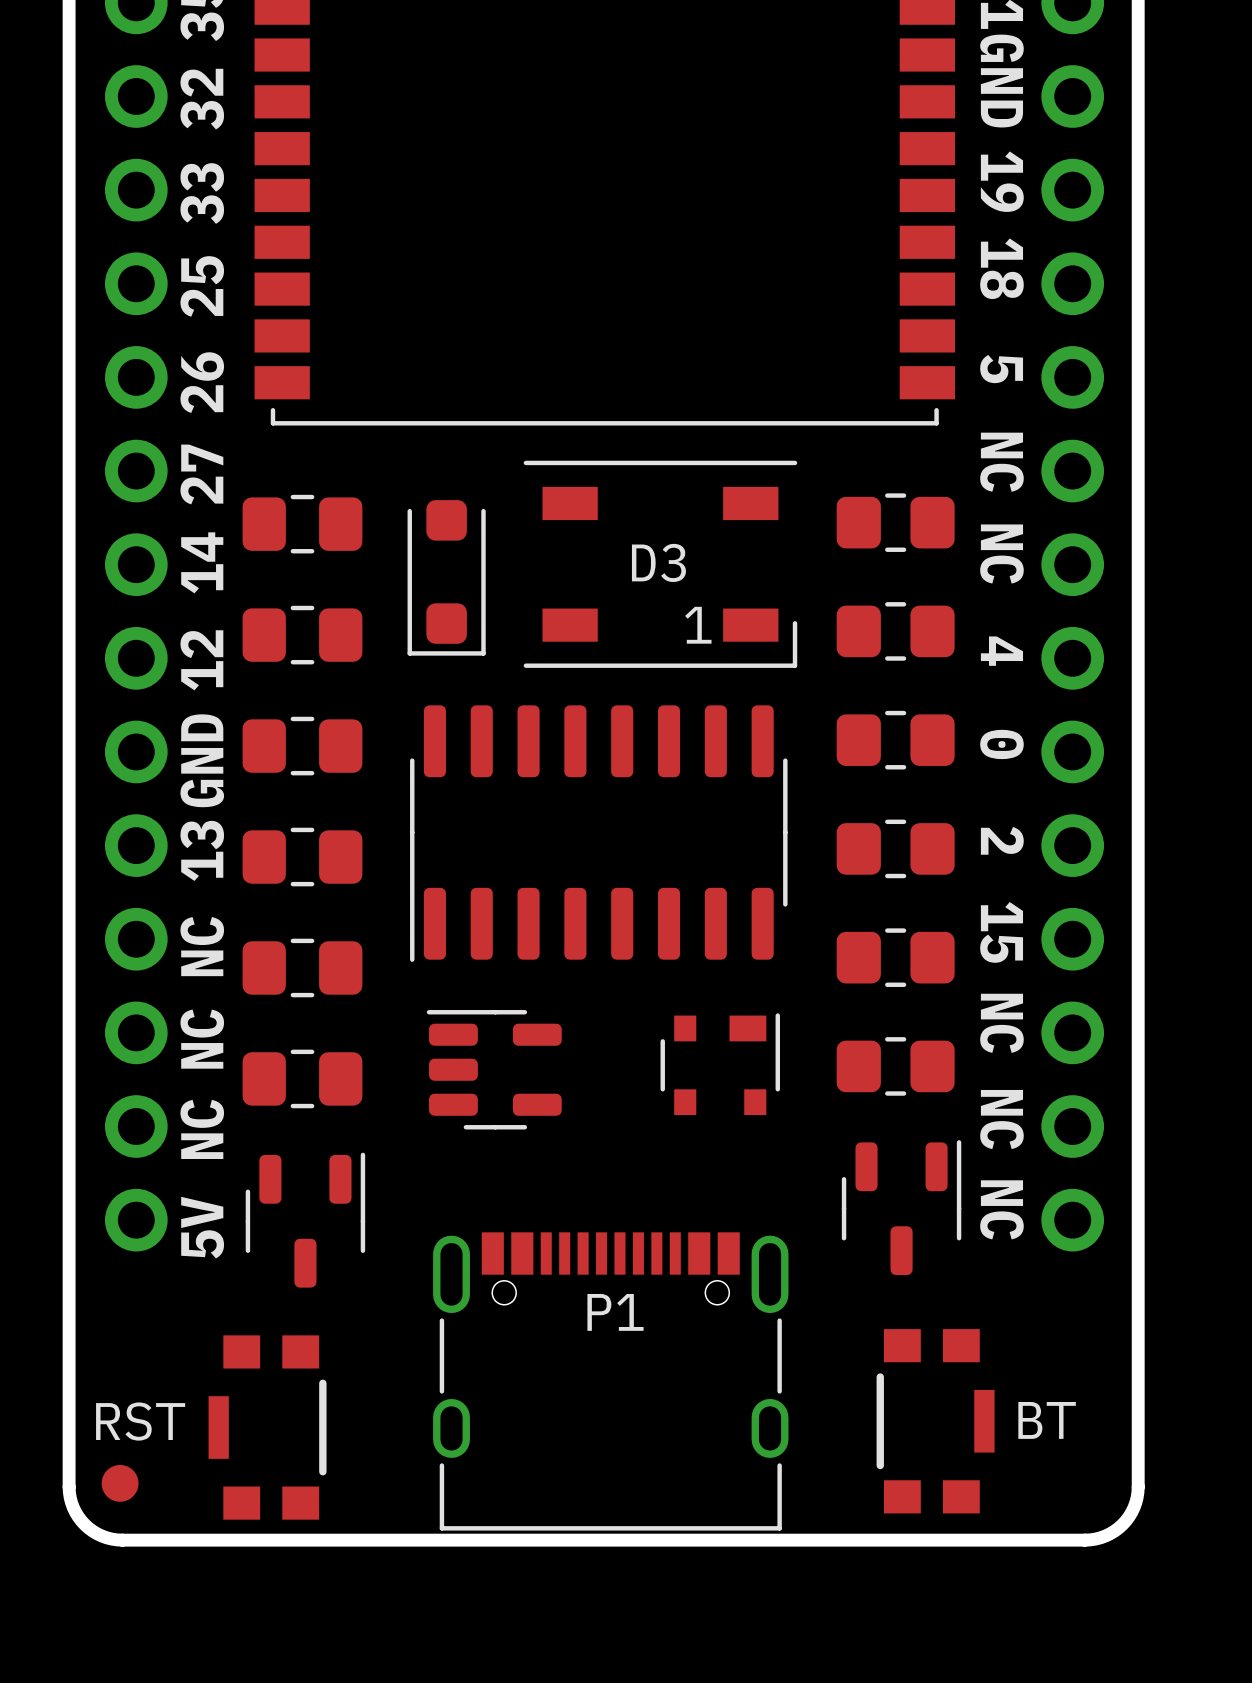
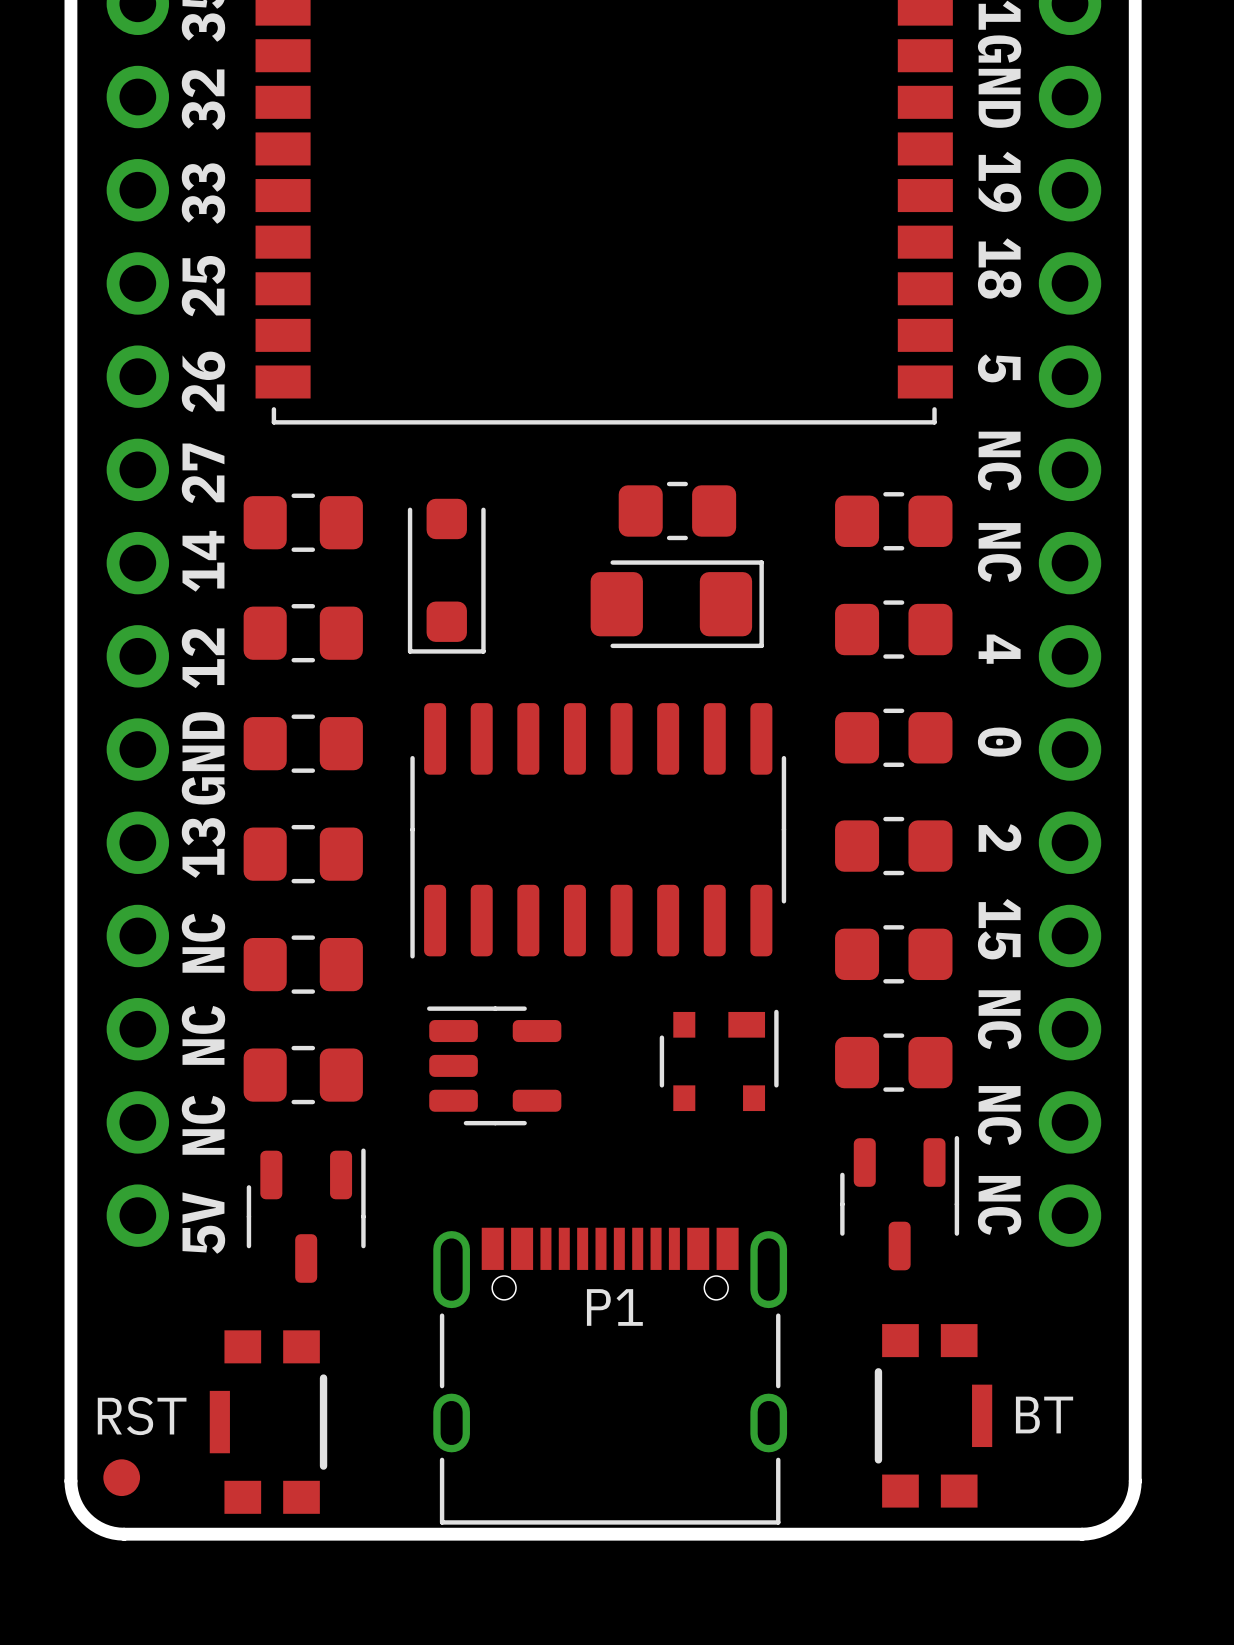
part: none -> (677, 510)
D3: (660, 564) -> none
part: none -> (677, 604)

